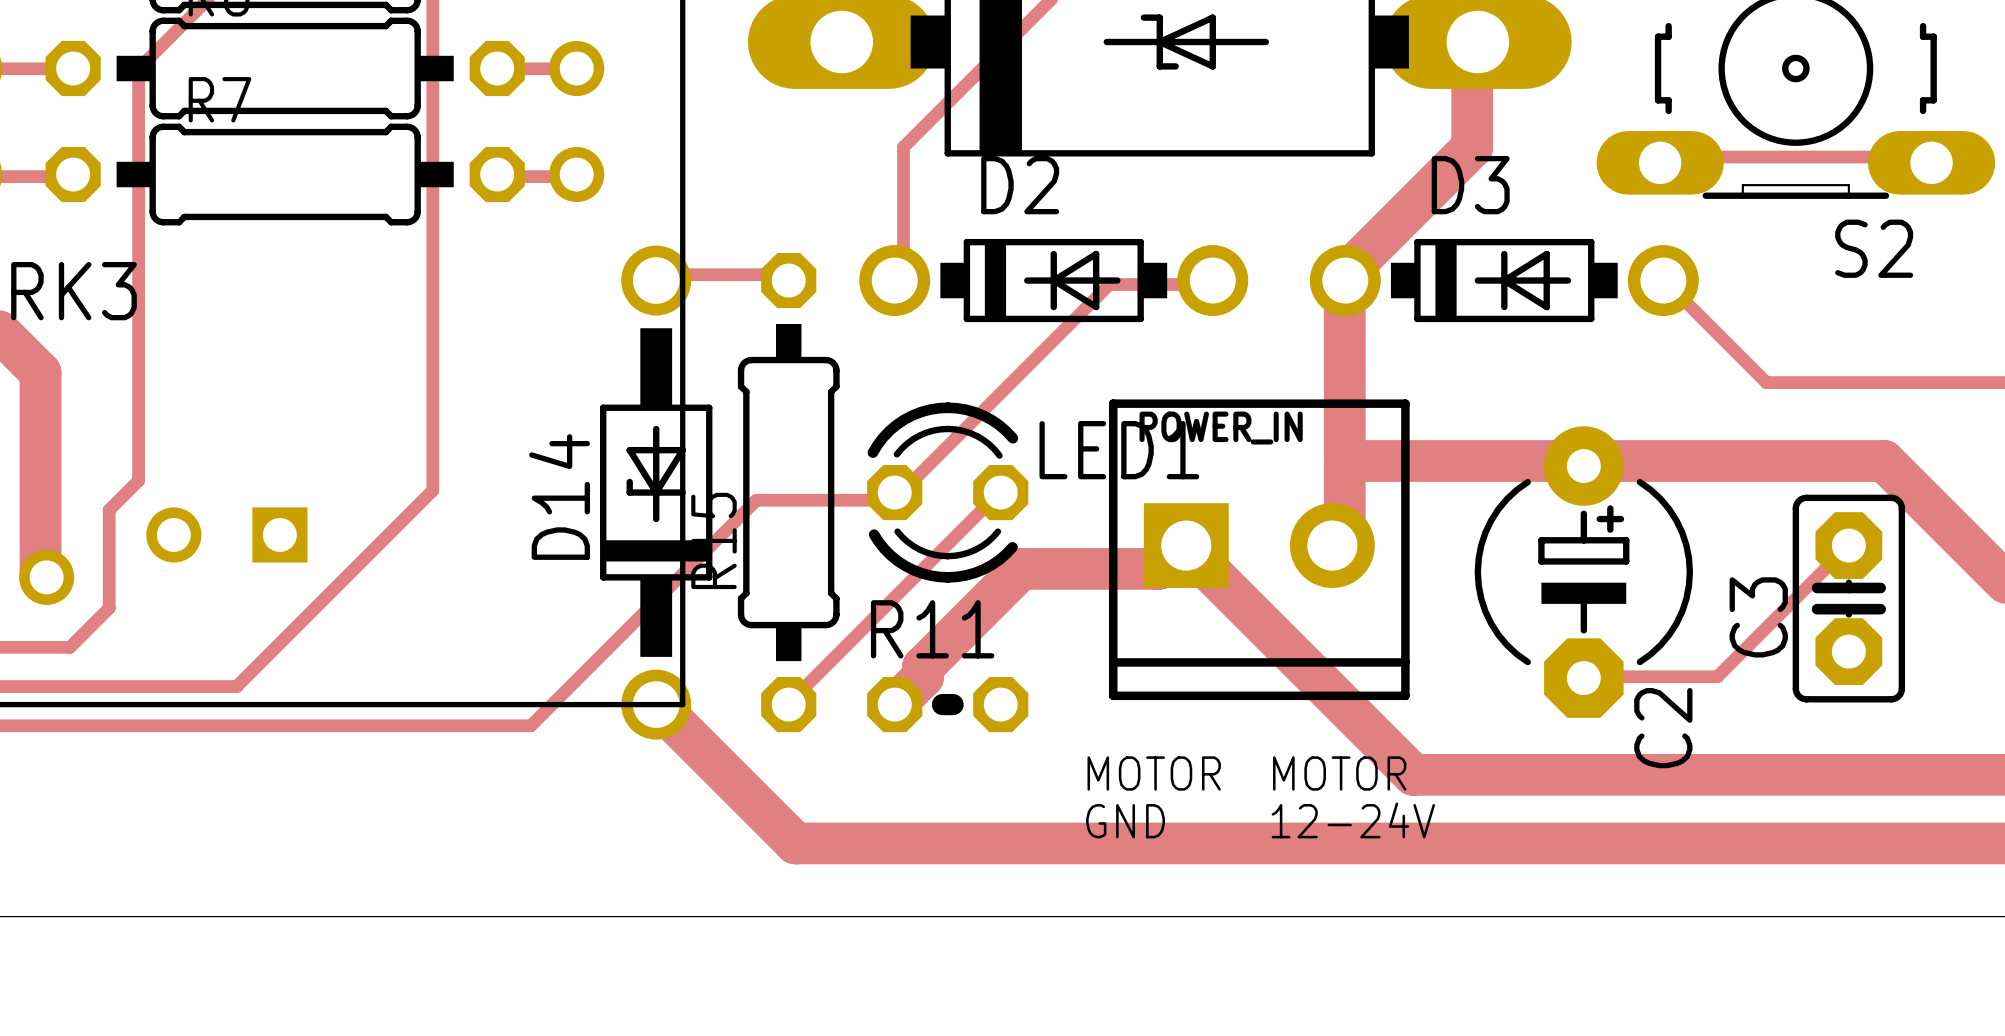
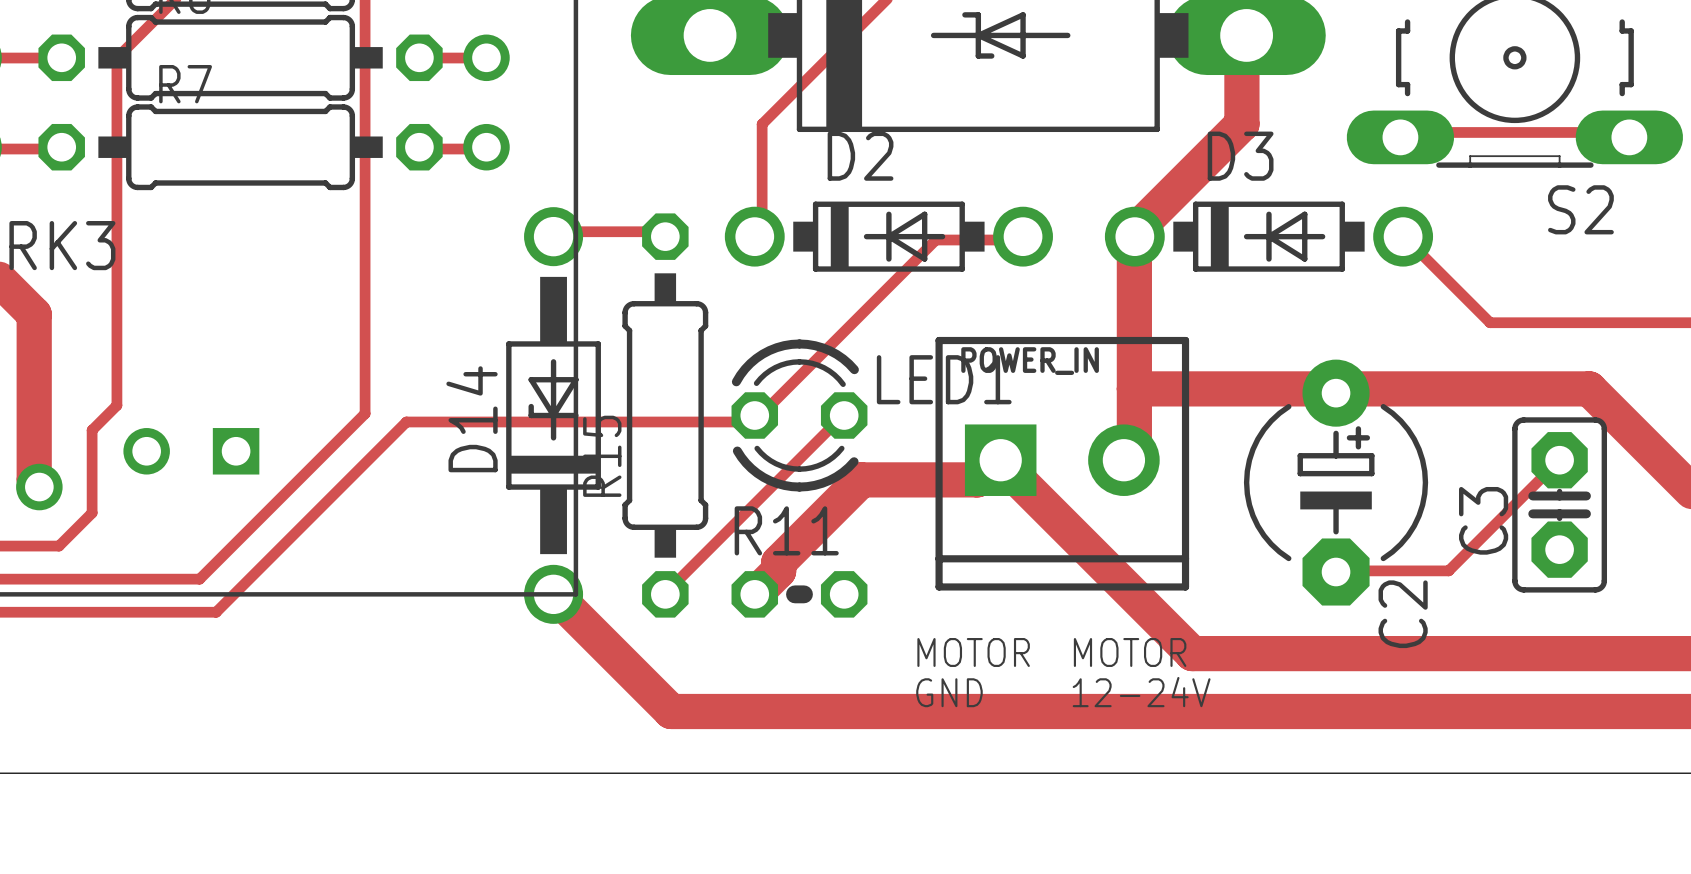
track: (756, 500) (530, 725) (256, 725) -> (638, 421) (406, 421) (216, 612)

